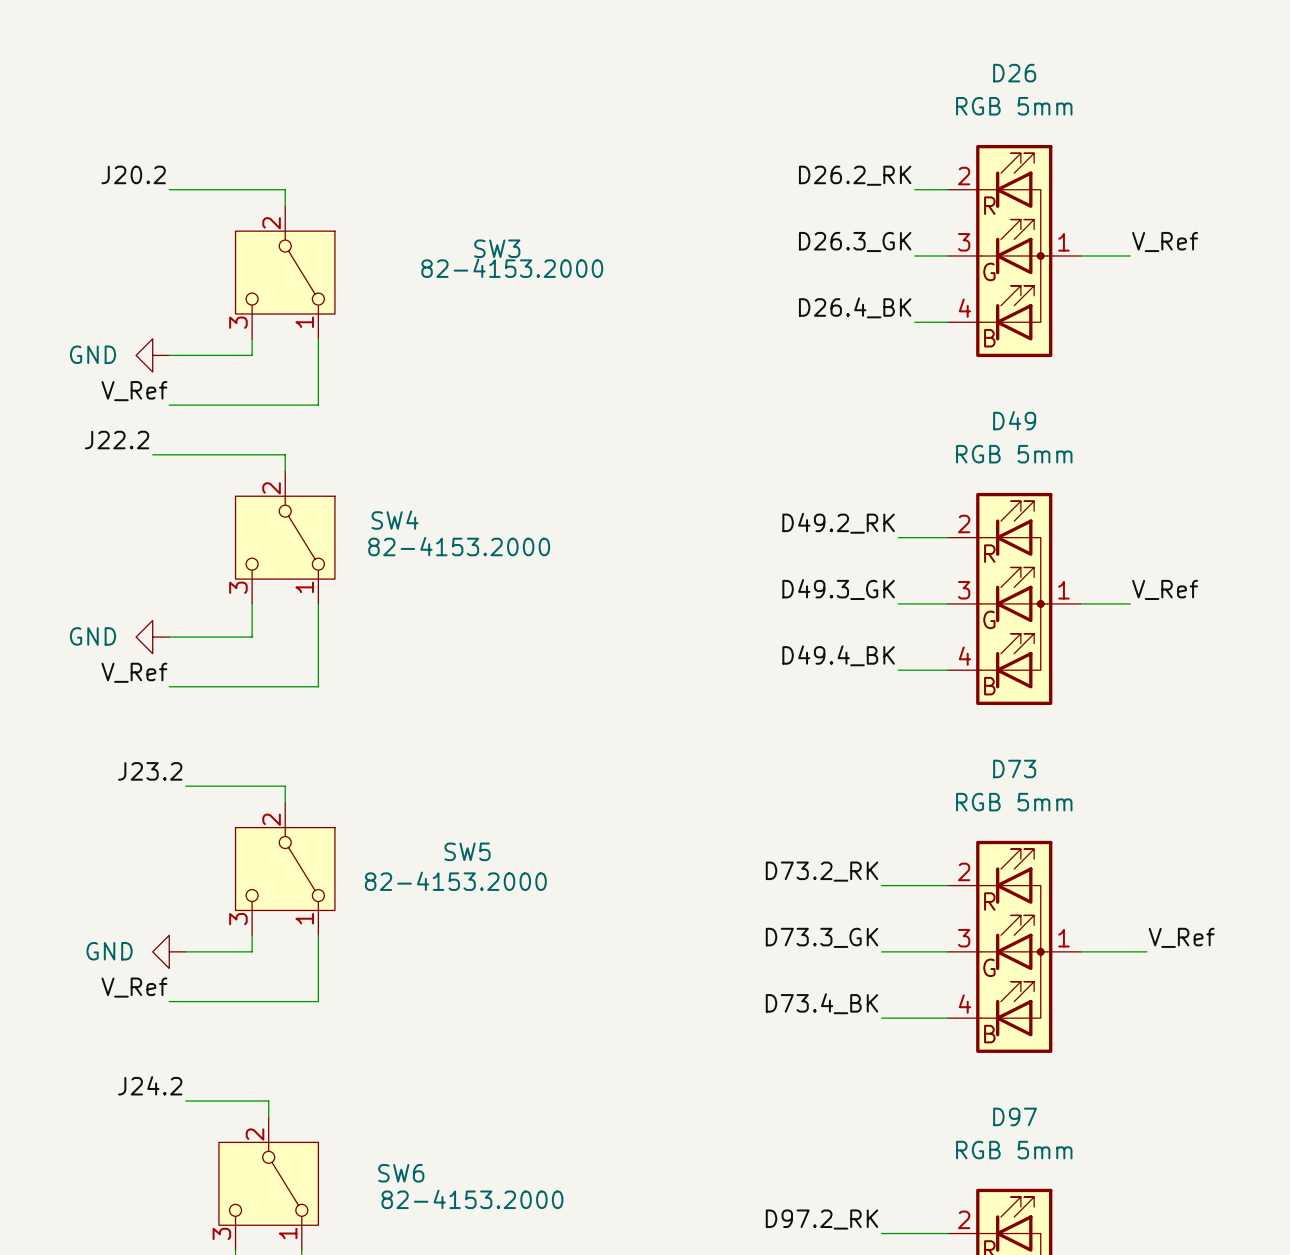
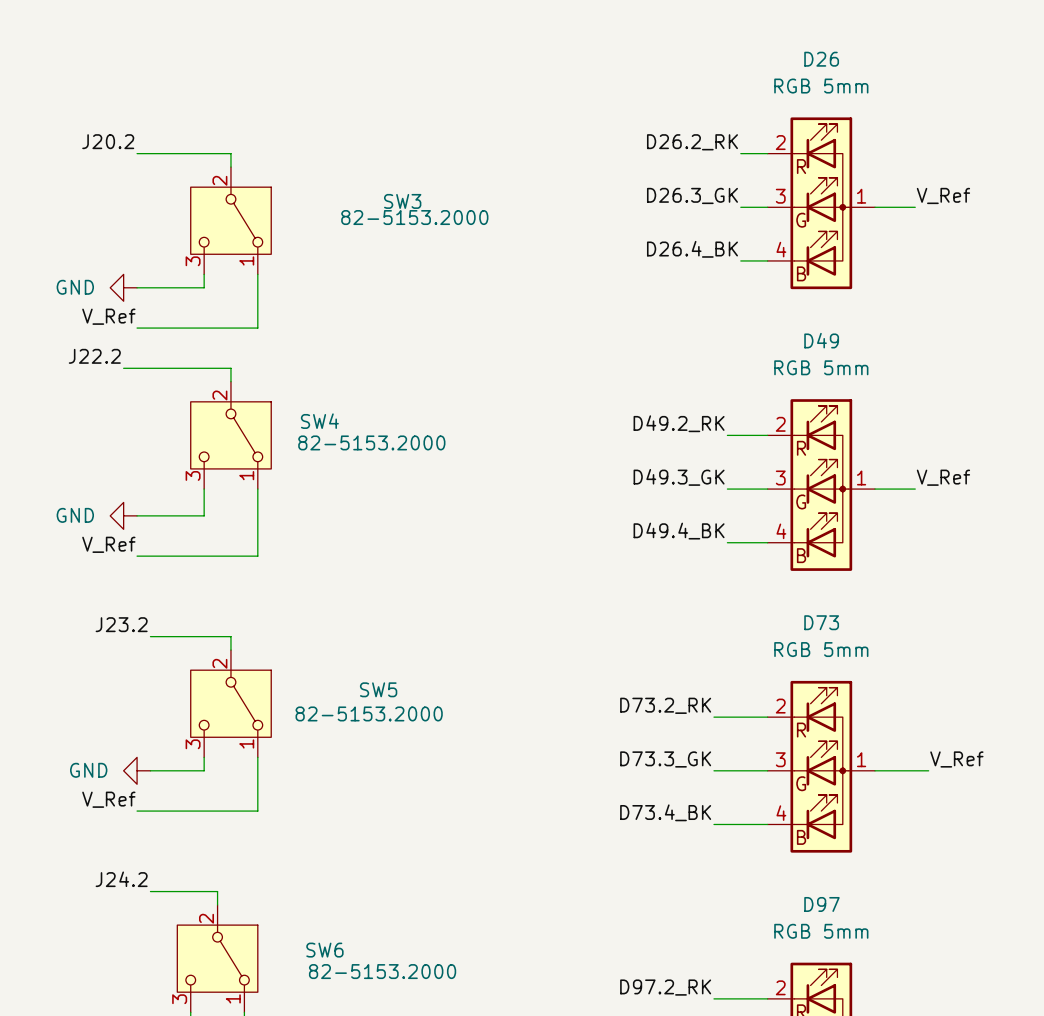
SW3 value: 82-4153.2000 (512, 268) -> 82-5153.2000 (414, 217)
SW4 value: 82-4153.2000 (459, 546) -> 82-5153.2000 (371, 442)
SW5 value: 82-4153.2000 (455, 881) -> 82-5153.2000 (369, 713)
SW6 value: 82-4153.2000 (472, 1199) -> 82-5153.2000 (382, 971)

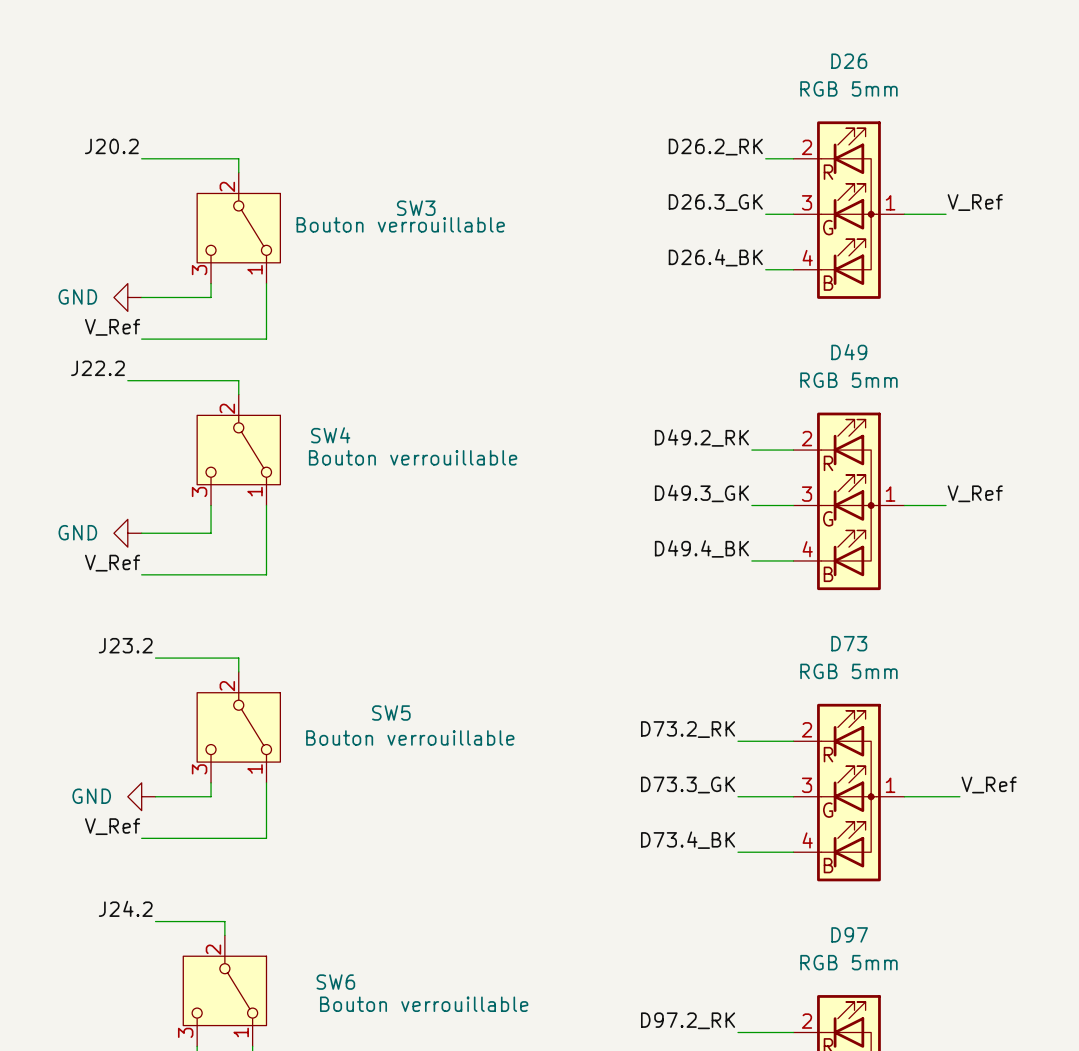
SW3 value: 82-5153.2000 (414, 217) -> Bouton verrouillable (400, 224)
SW4 value: 82-5153.2000 (371, 442) -> Bouton verrouillable (413, 457)
SW5 value: 82-5153.2000 (369, 713) -> Bouton verrouillable (410, 737)
SW6 value: 82-5153.2000 (382, 971) -> Bouton verrouillable (424, 1004)

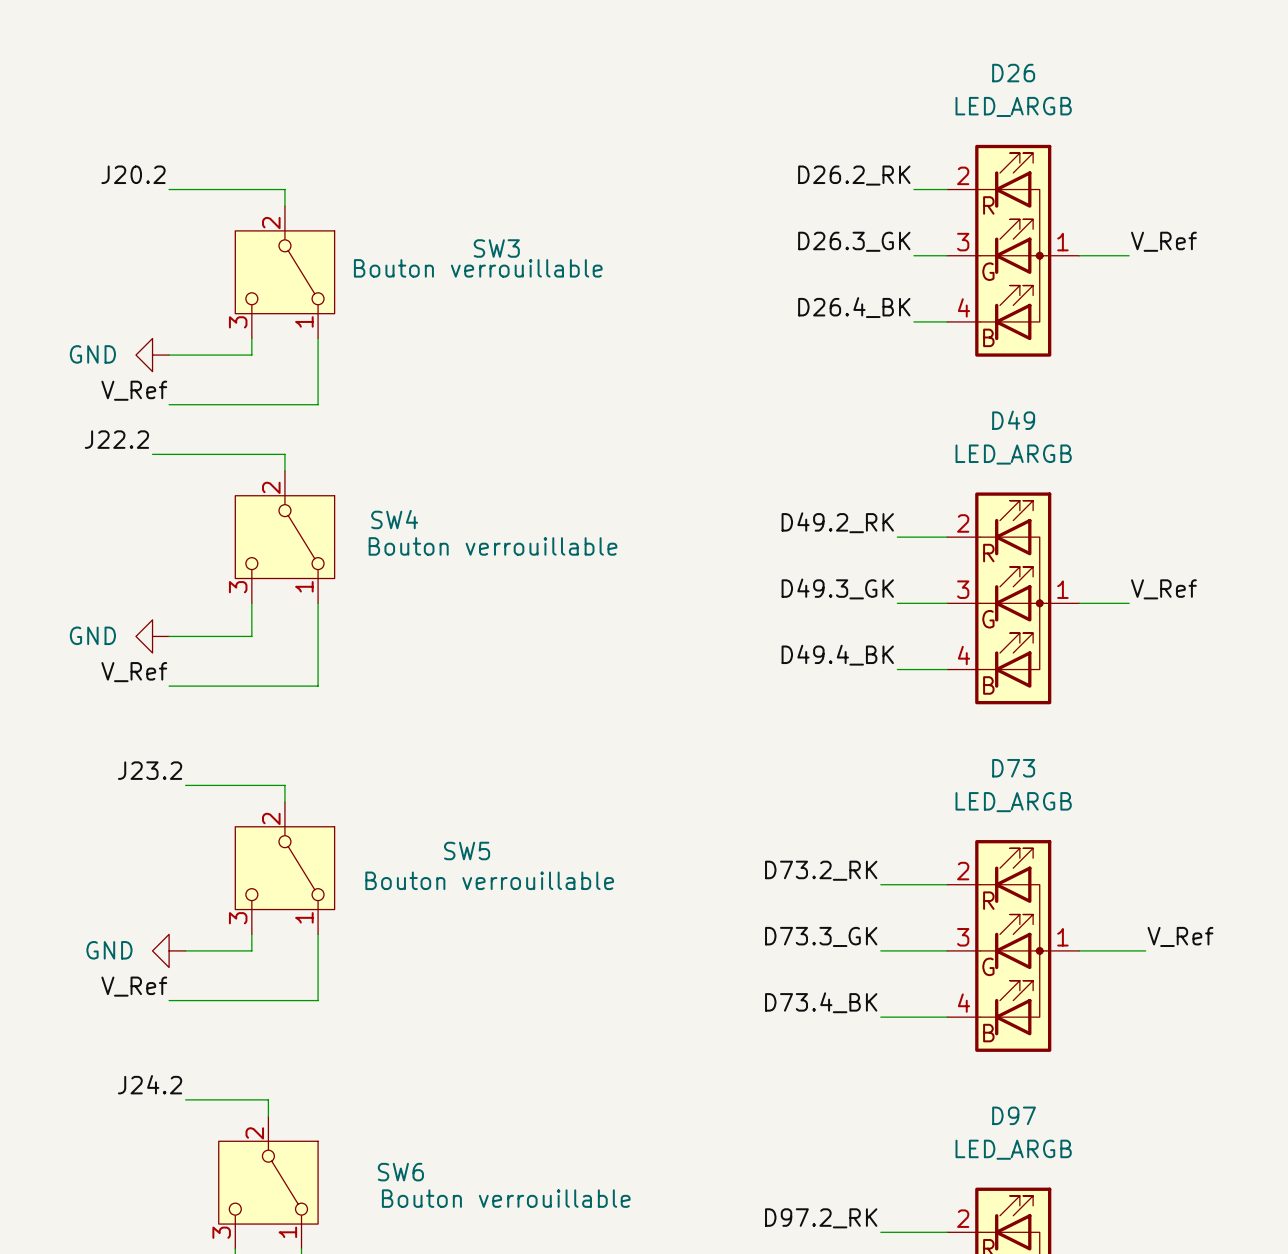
D26 value: RGB 5mm (848, 88) -> LED_ARGB (1013, 106)
D49 value: RGB 5mm (848, 380) -> LED_ARGB (1013, 454)
D73 value: RGB 5mm (848, 671) -> LED_ARGB (1013, 802)
D97 value: RGB 5mm (848, 962) -> LED_ARGB (1013, 1149)

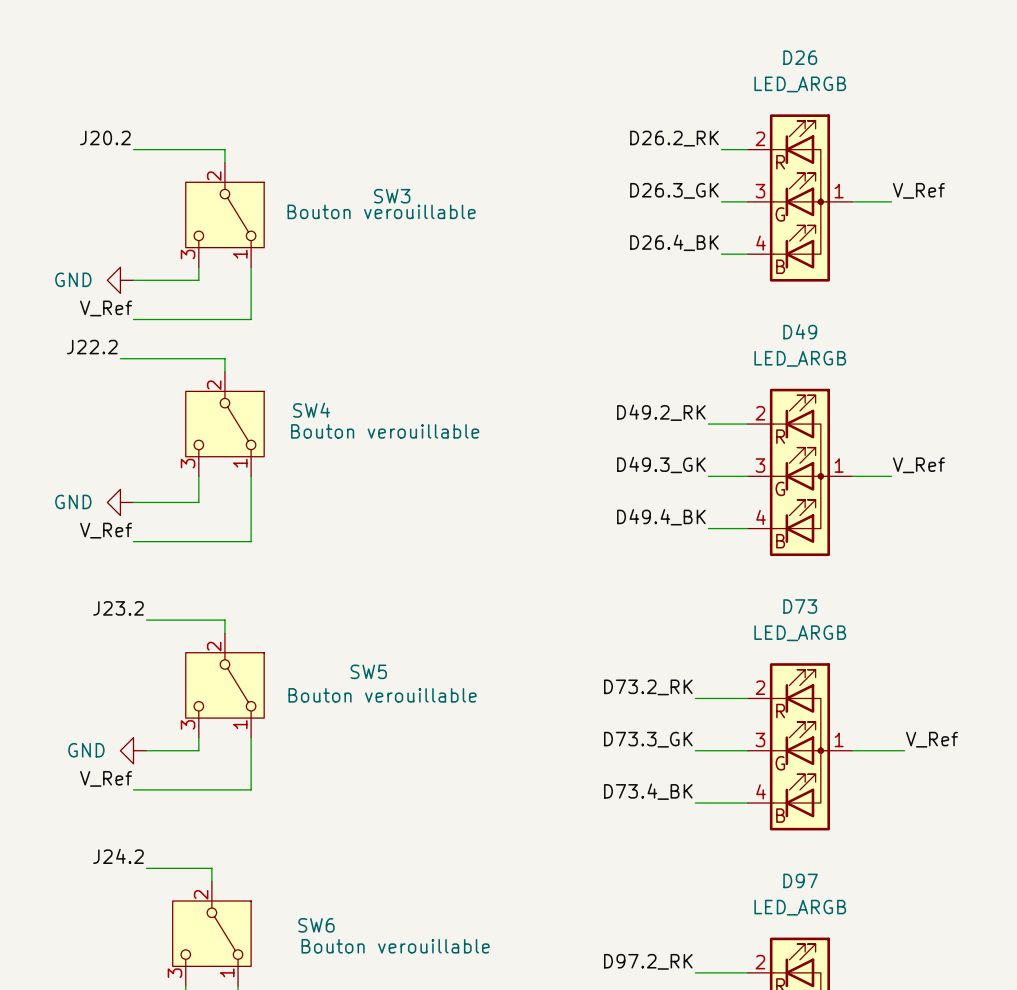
SW3 value: Bouton verrouillable (478, 268) -> Bouton verouillable (381, 211)
SW4 value: Bouton verrouillable (493, 546) -> Bouton verouillable (385, 431)
SW5 value: Bouton verrouillable (489, 880) -> Bouton verouillable (382, 695)
SW6 value: Bouton verrouillable (506, 1198) -> Bouton verouillable (395, 946)

